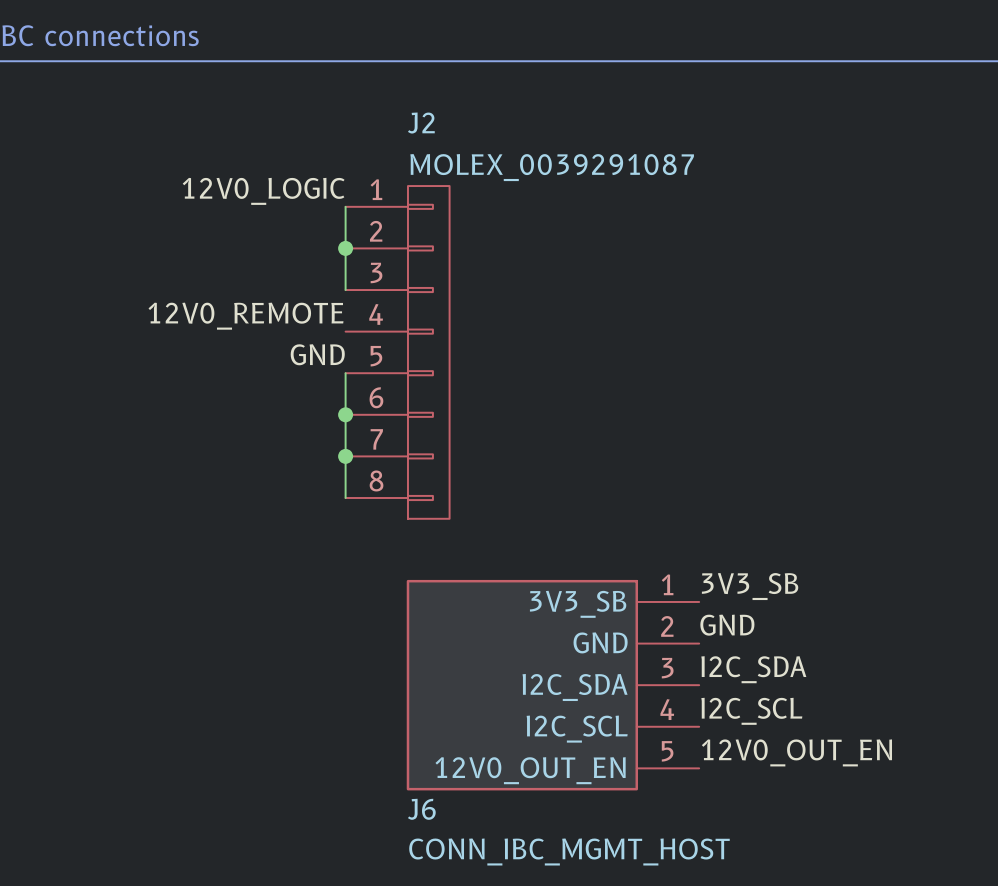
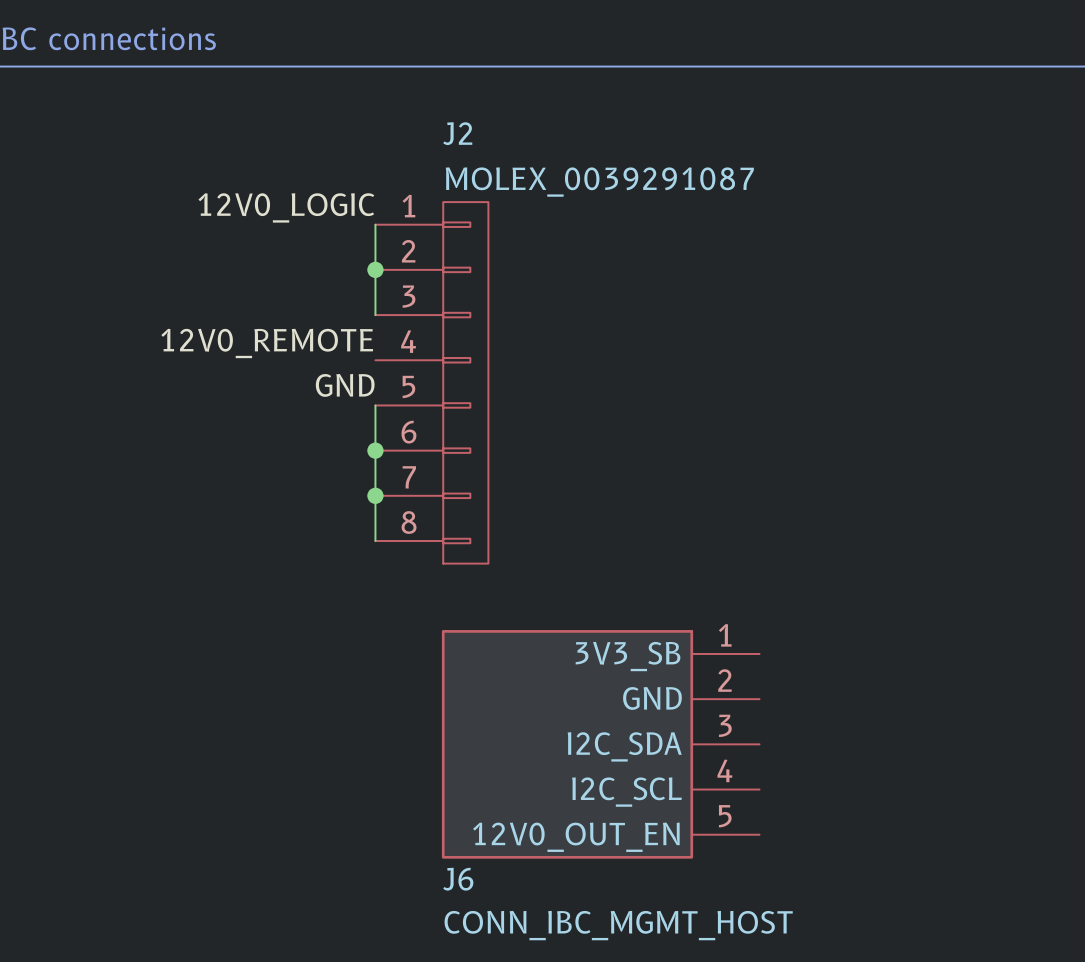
label: 3V3_SB (750, 586) -> none
label: GND (727, 625) -> none
label: I2C_SDA (753, 669) -> none
label: I2C_SCL (751, 711) -> none
label: 12V0_OUT_EN (796, 752) -> none

